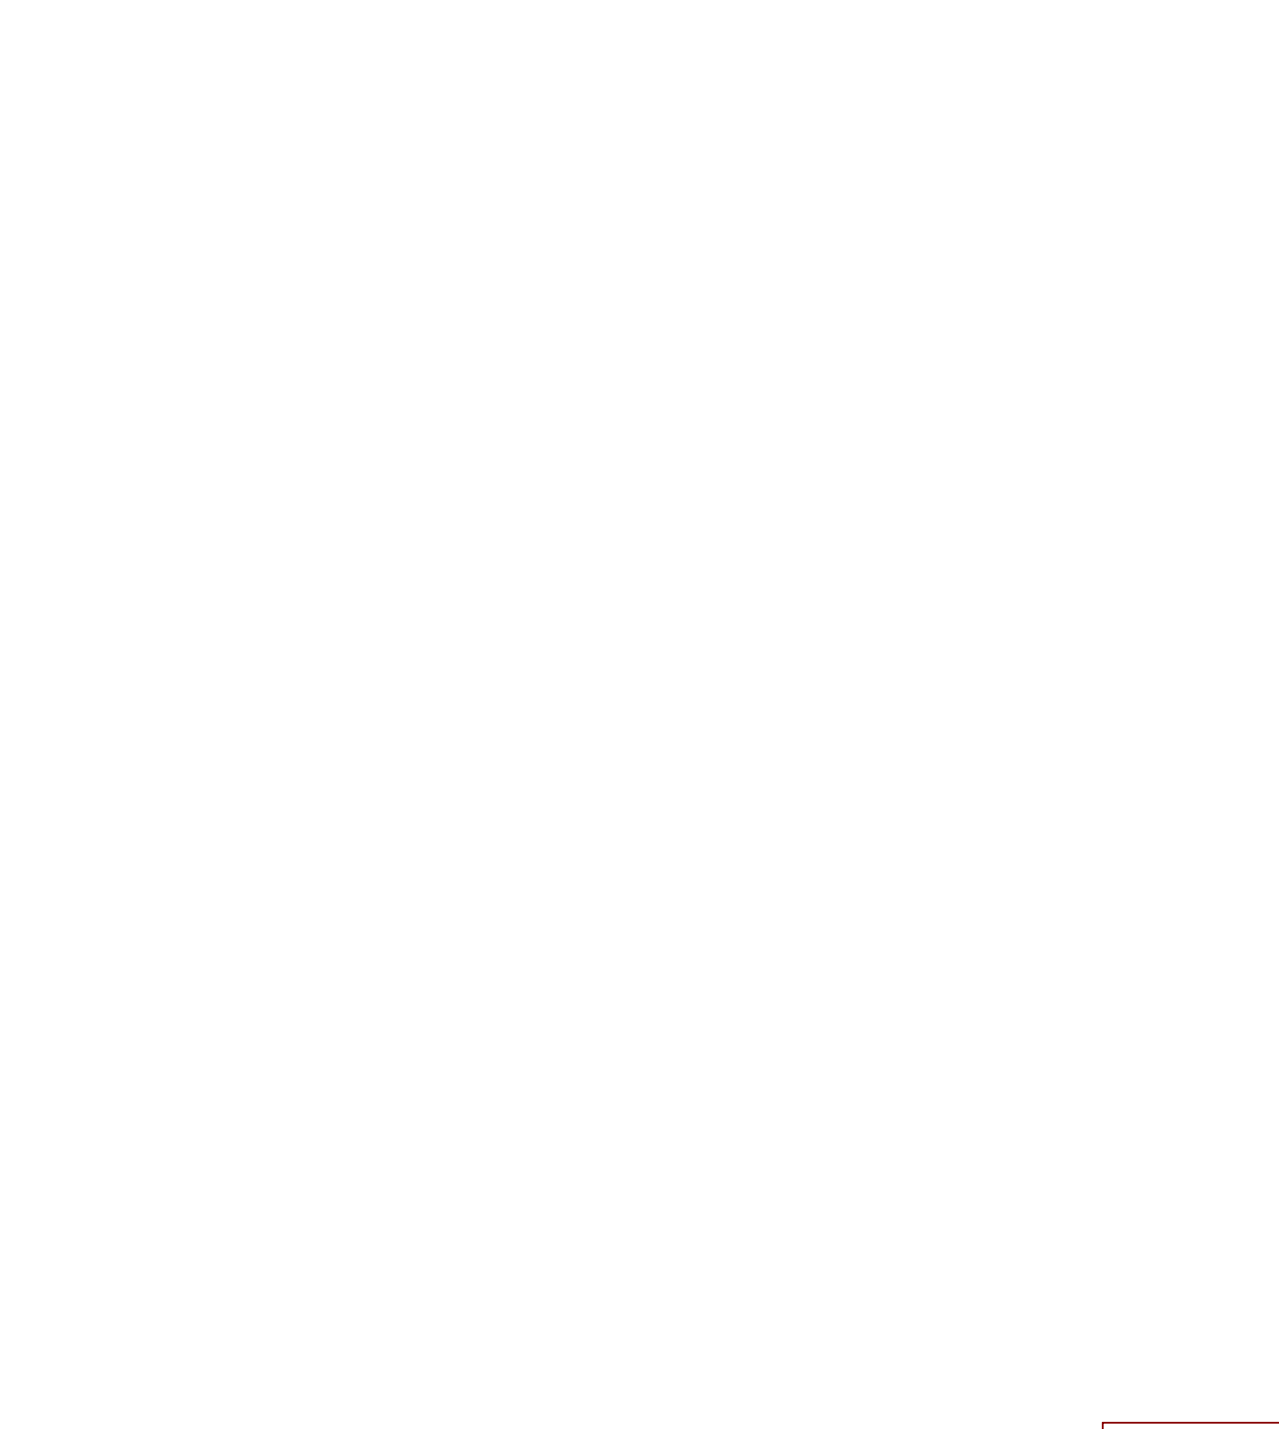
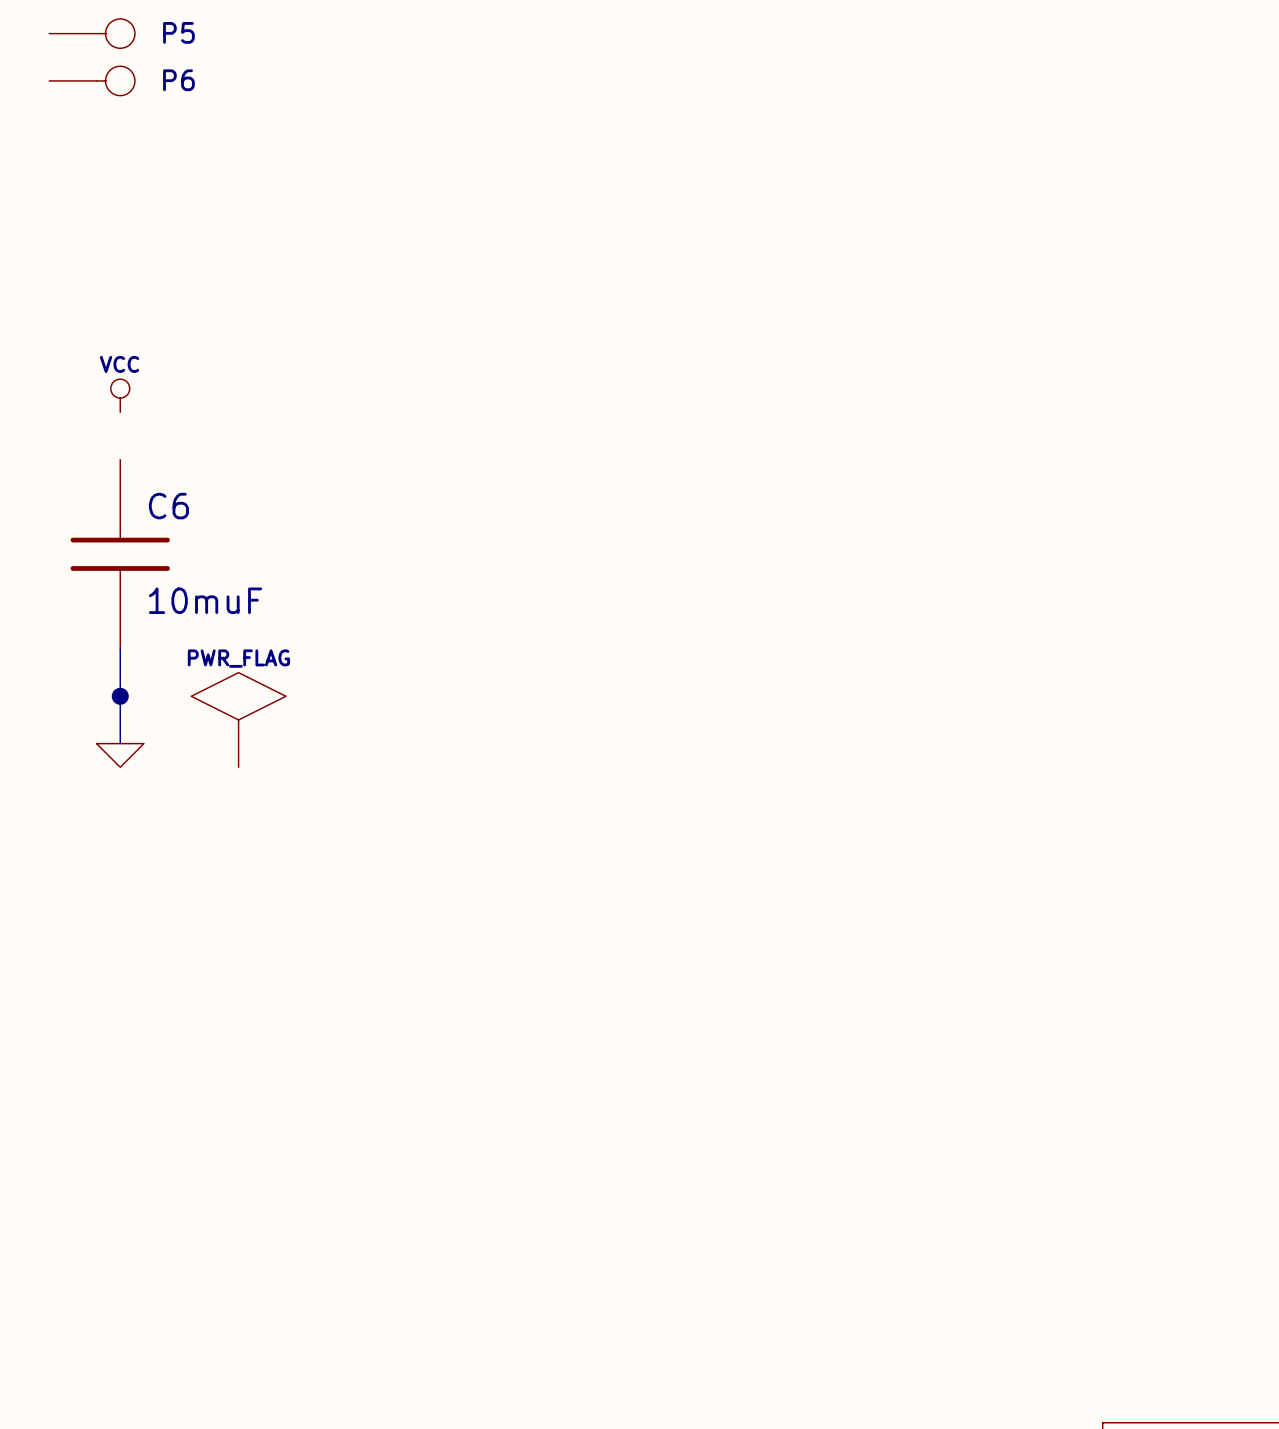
P5: none -> (92, 33)
P6: none -> (92, 80)
power symbol: none -> VCC (120, 395)
C6: none -> 10muF (120, 554)
wire: none -> (120, 648) (120, 743)
junction: none -> (120, 696)
power symbol: none -> PWR_FLAG (238, 719)
power symbol: none -> (120, 755)

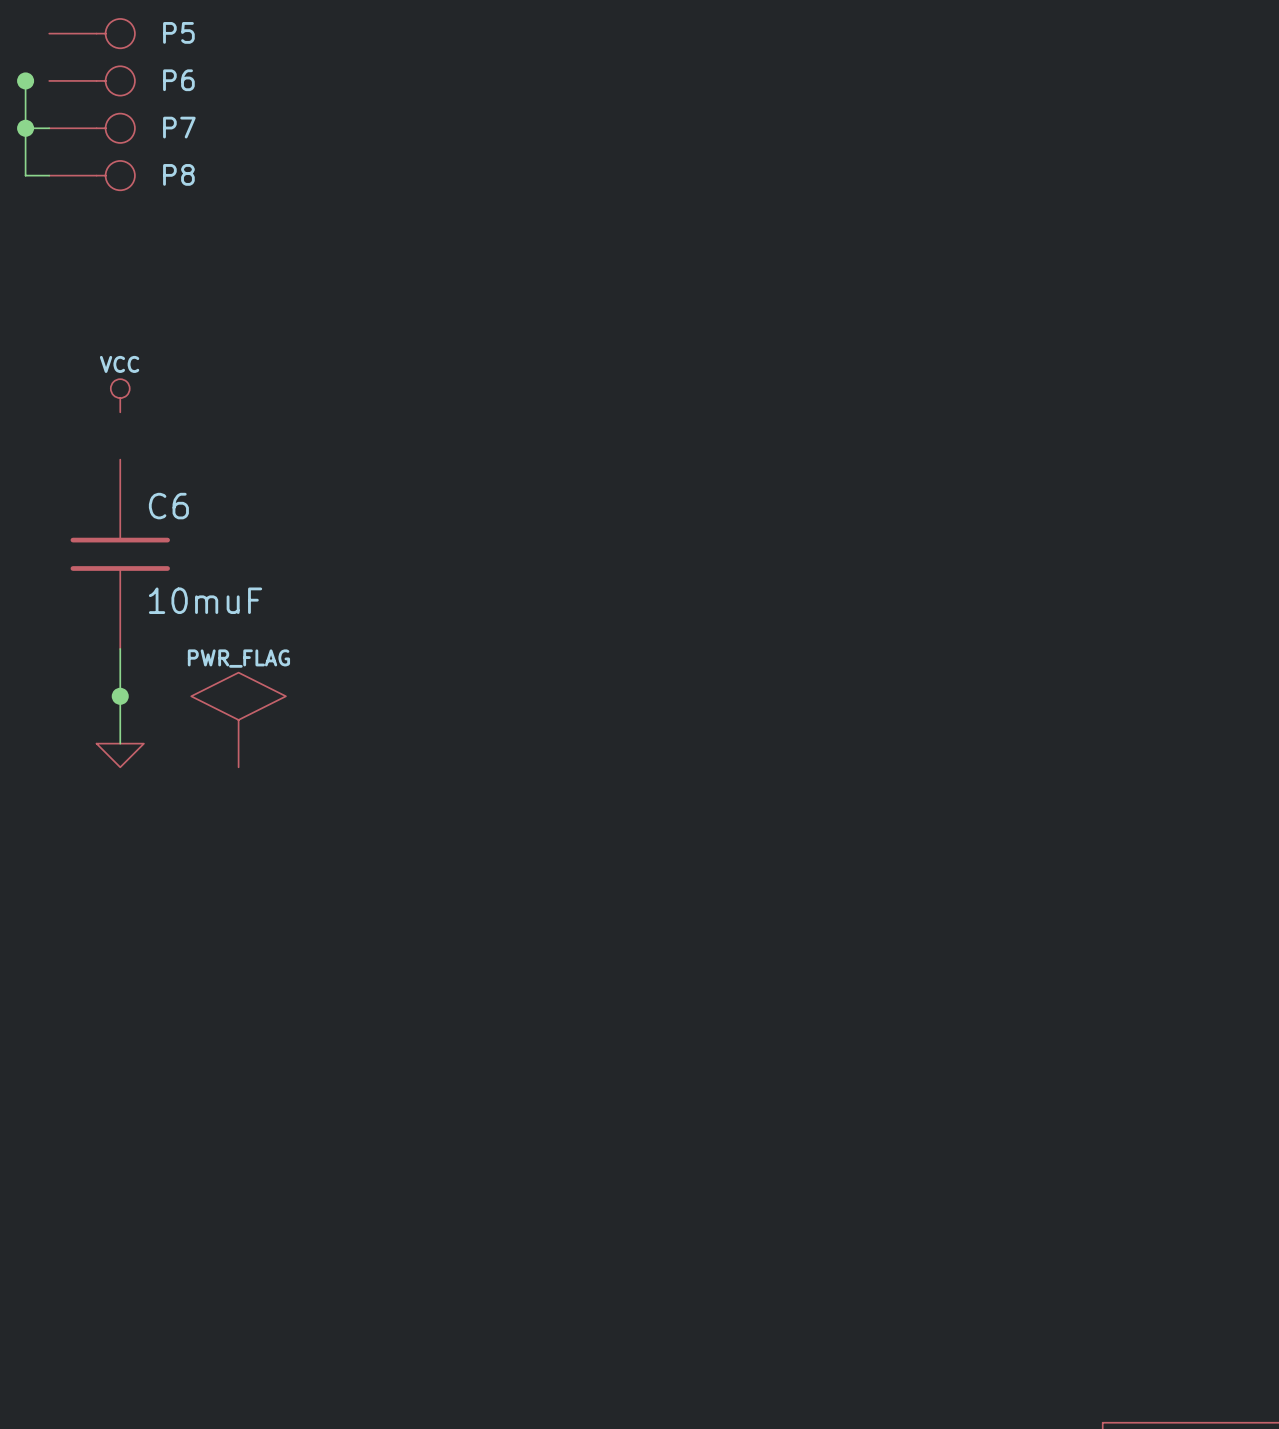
wire: none -> (25, 80) (25, 175) (49, 175)
junction: none -> (25, 80)
wire: none -> (25, 128) (49, 128)
junction: none -> (25, 128)
P7: none -> (92, 128)
P8: none -> (92, 175)

